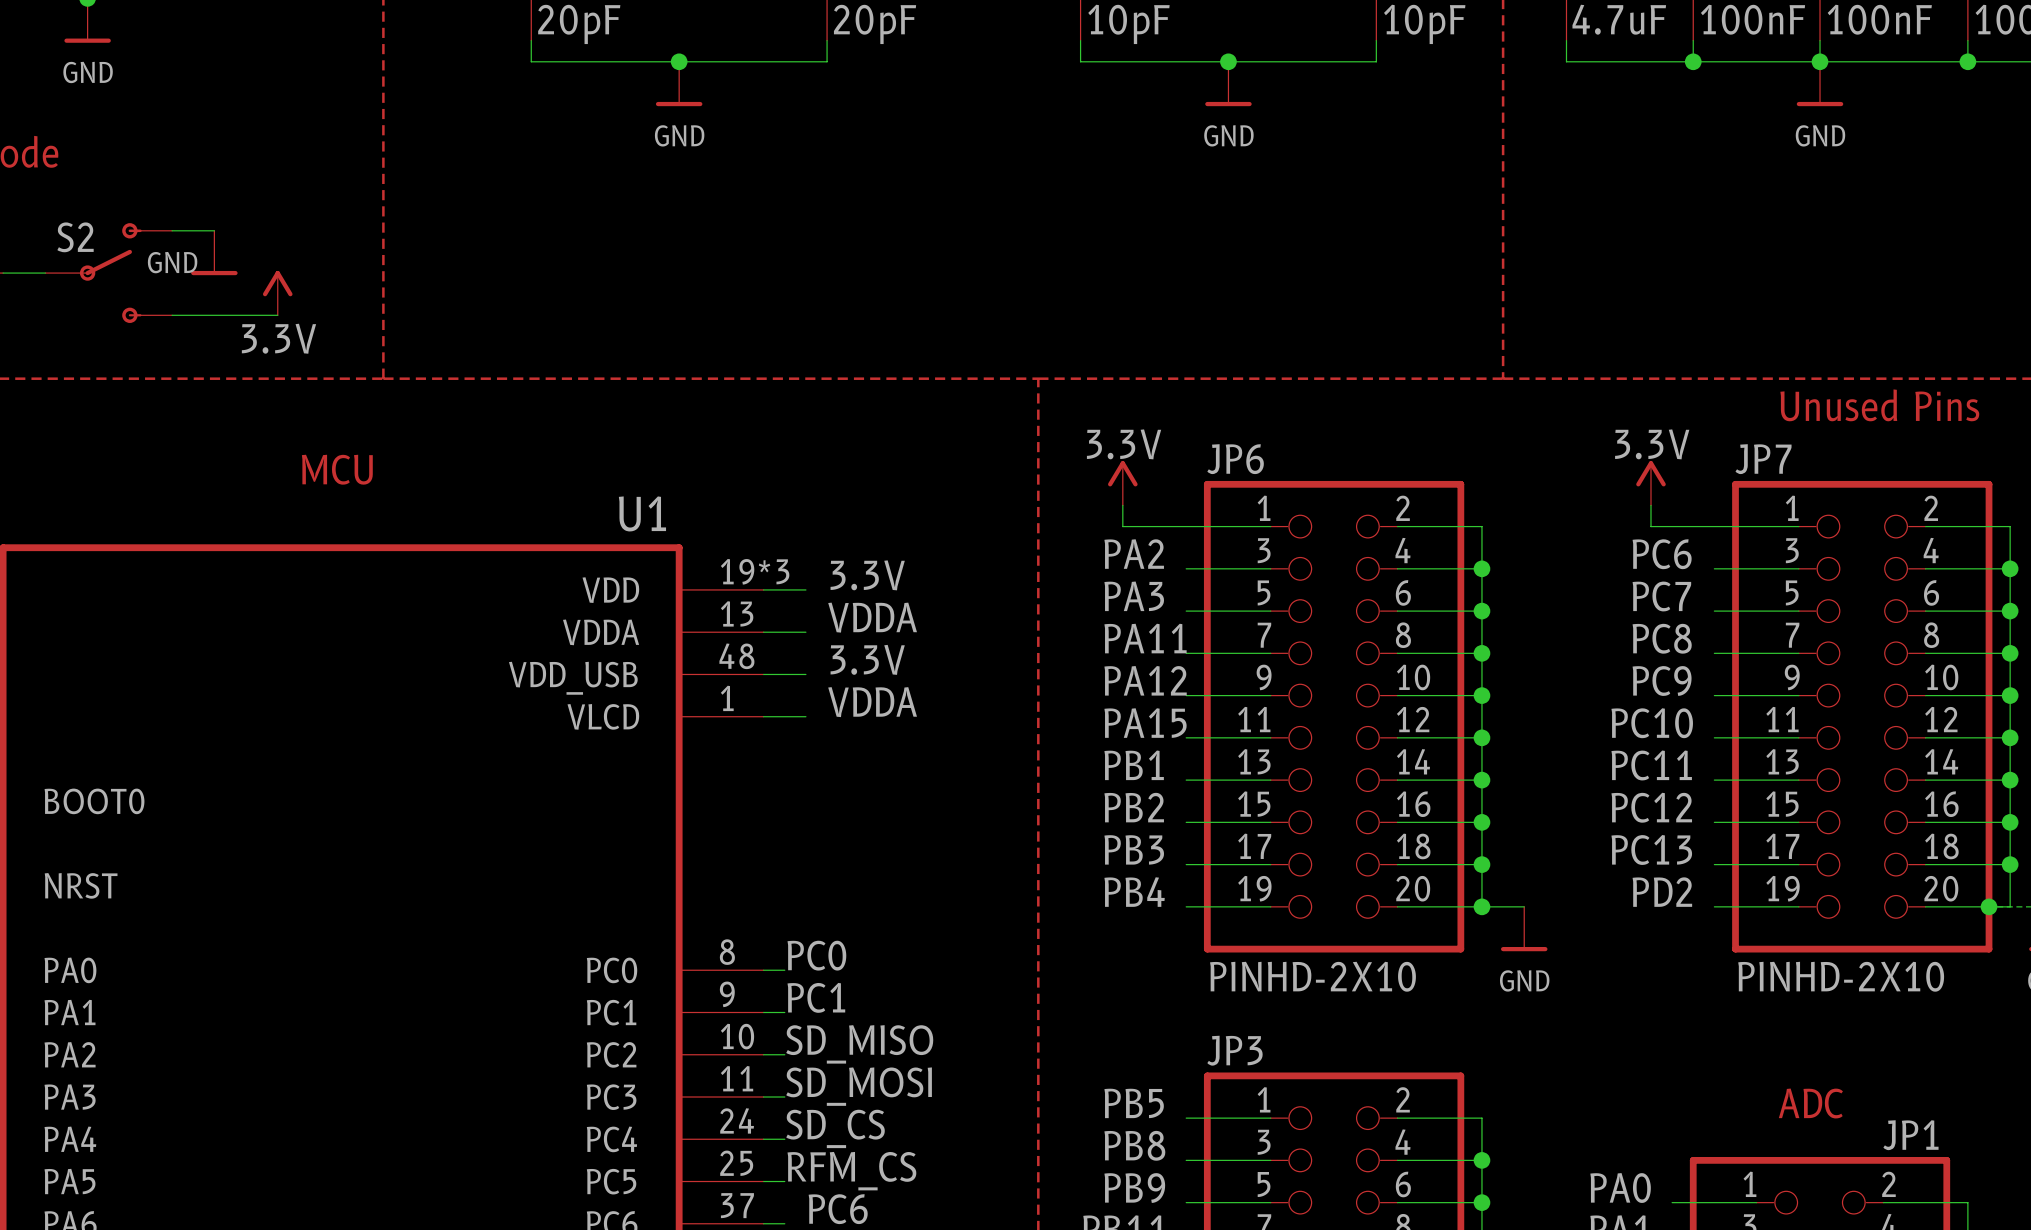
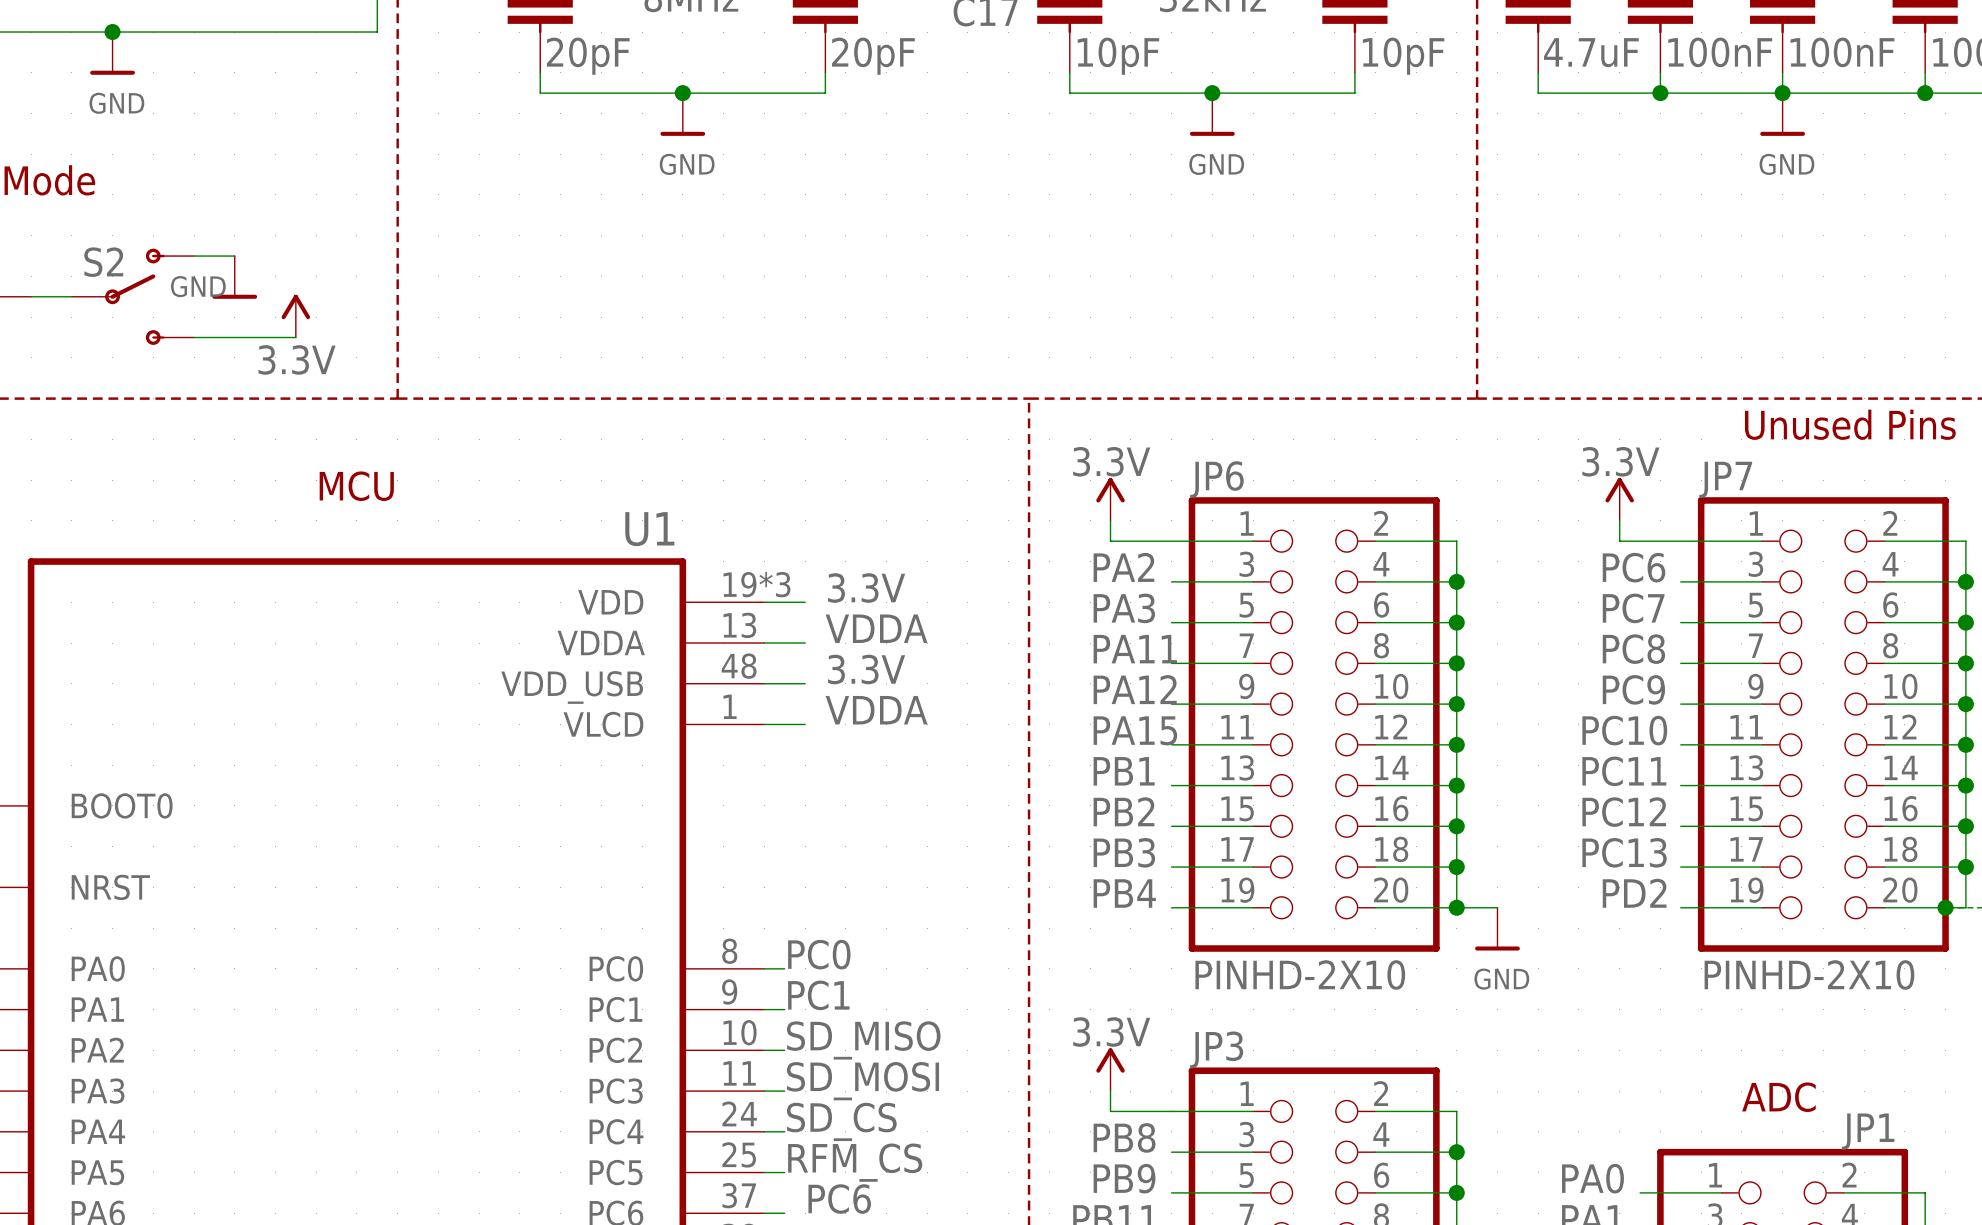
power symbol: none -> 3.3V (1110, 1069)
wire: none -> (1110, 1091) (1110, 1111) (1171, 1111)
label: PB5 (1134, 1103) -> none

